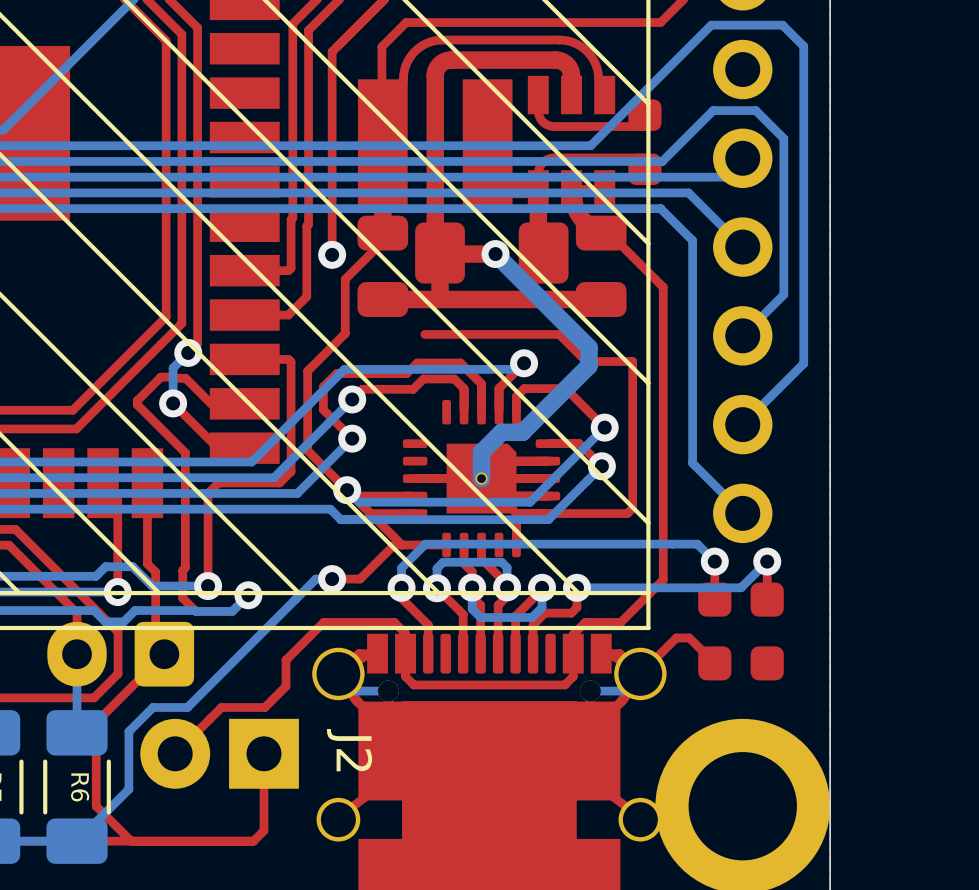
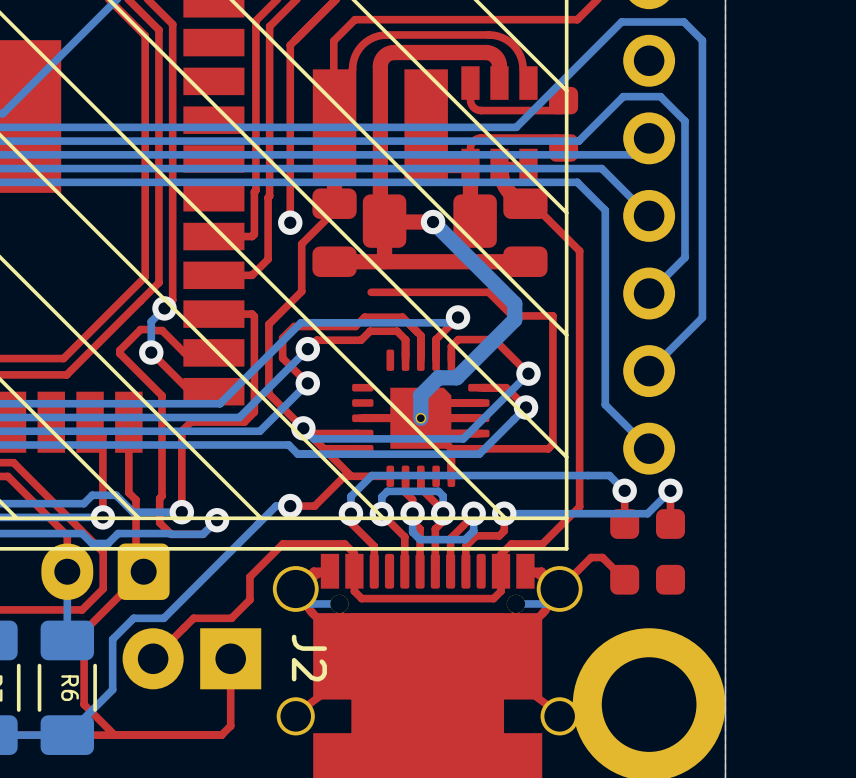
part footprint: [357, 35, 662, 317] -> [312, 31, 579, 278]

